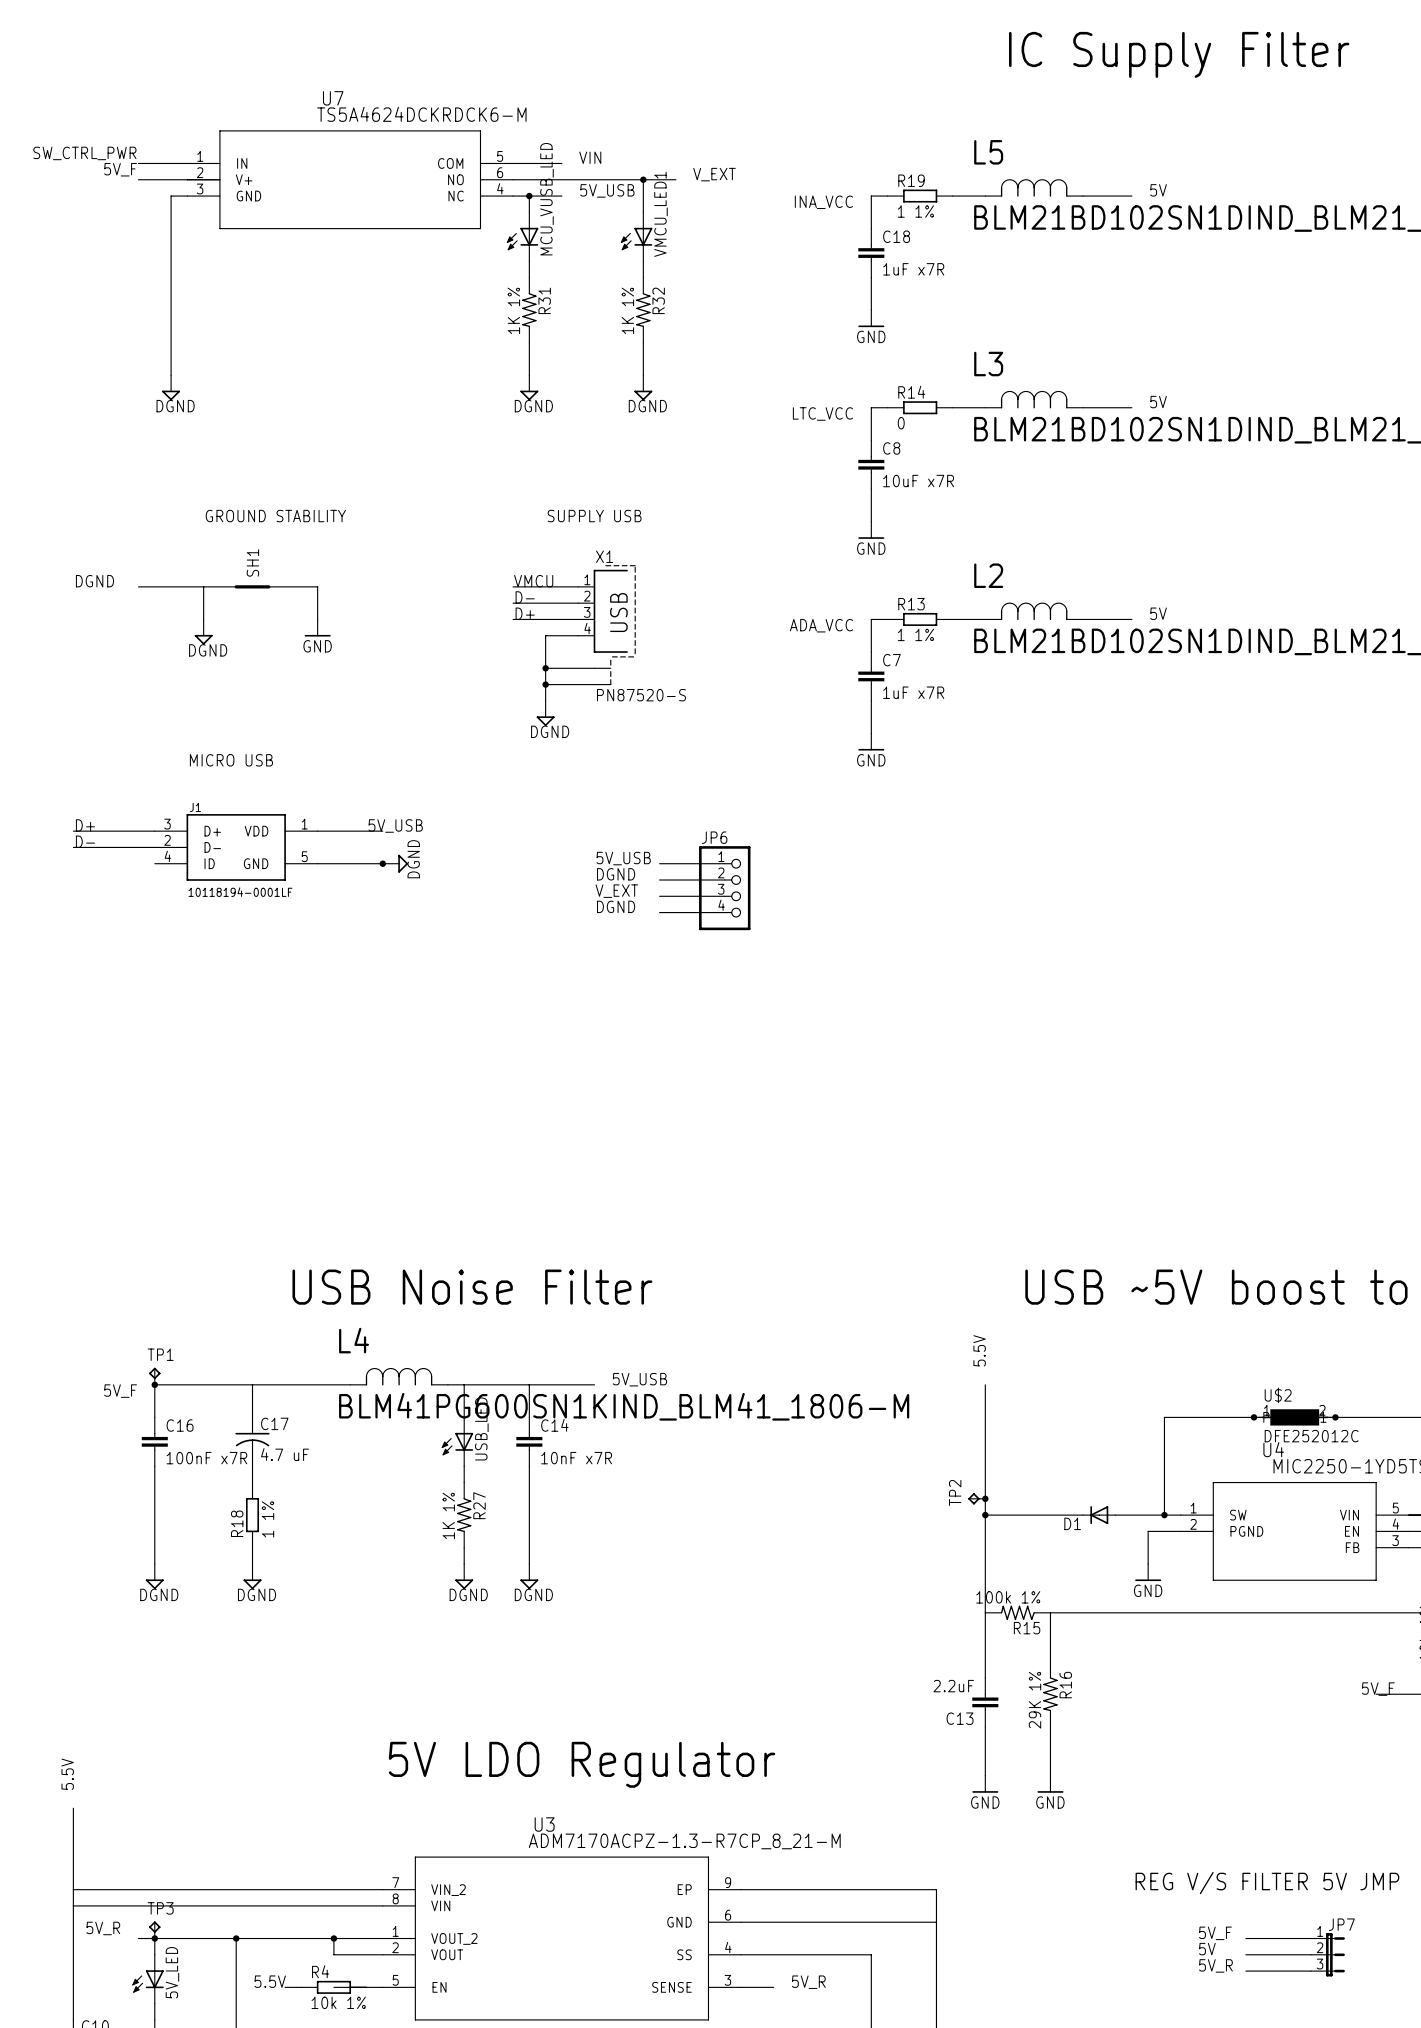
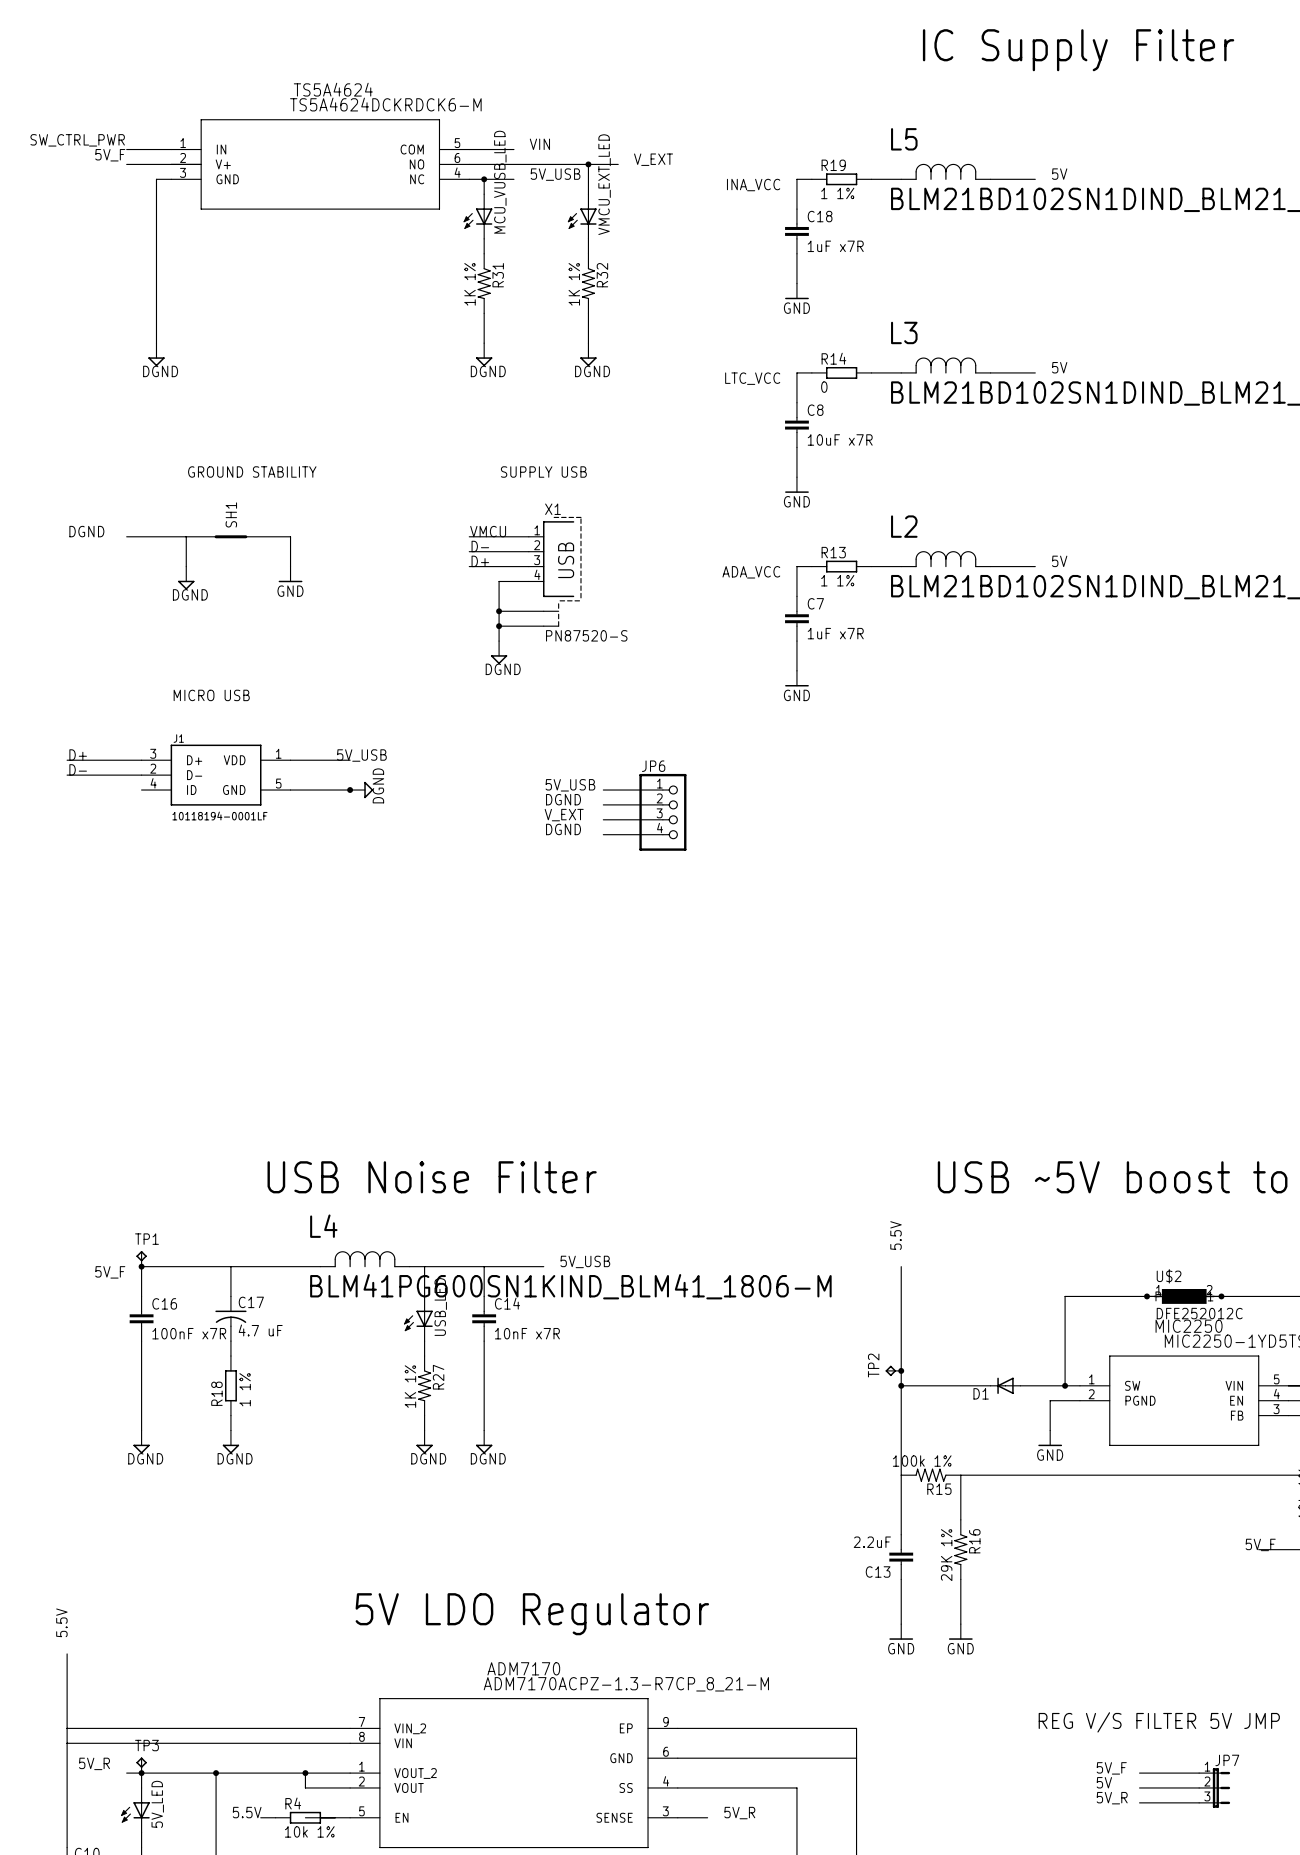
U7 name: U7 (333, 98) -> TS5A4624 (333, 89)
VMCU_LED1 name: VMCU_LED1 (660, 214) -> VMCU_EXT_LED (604, 184)
U4 name: U4 (1273, 1449) -> MIC2250 (1189, 1326)
U3 name: U3 (544, 1824) -> ADM7170 (523, 1668)

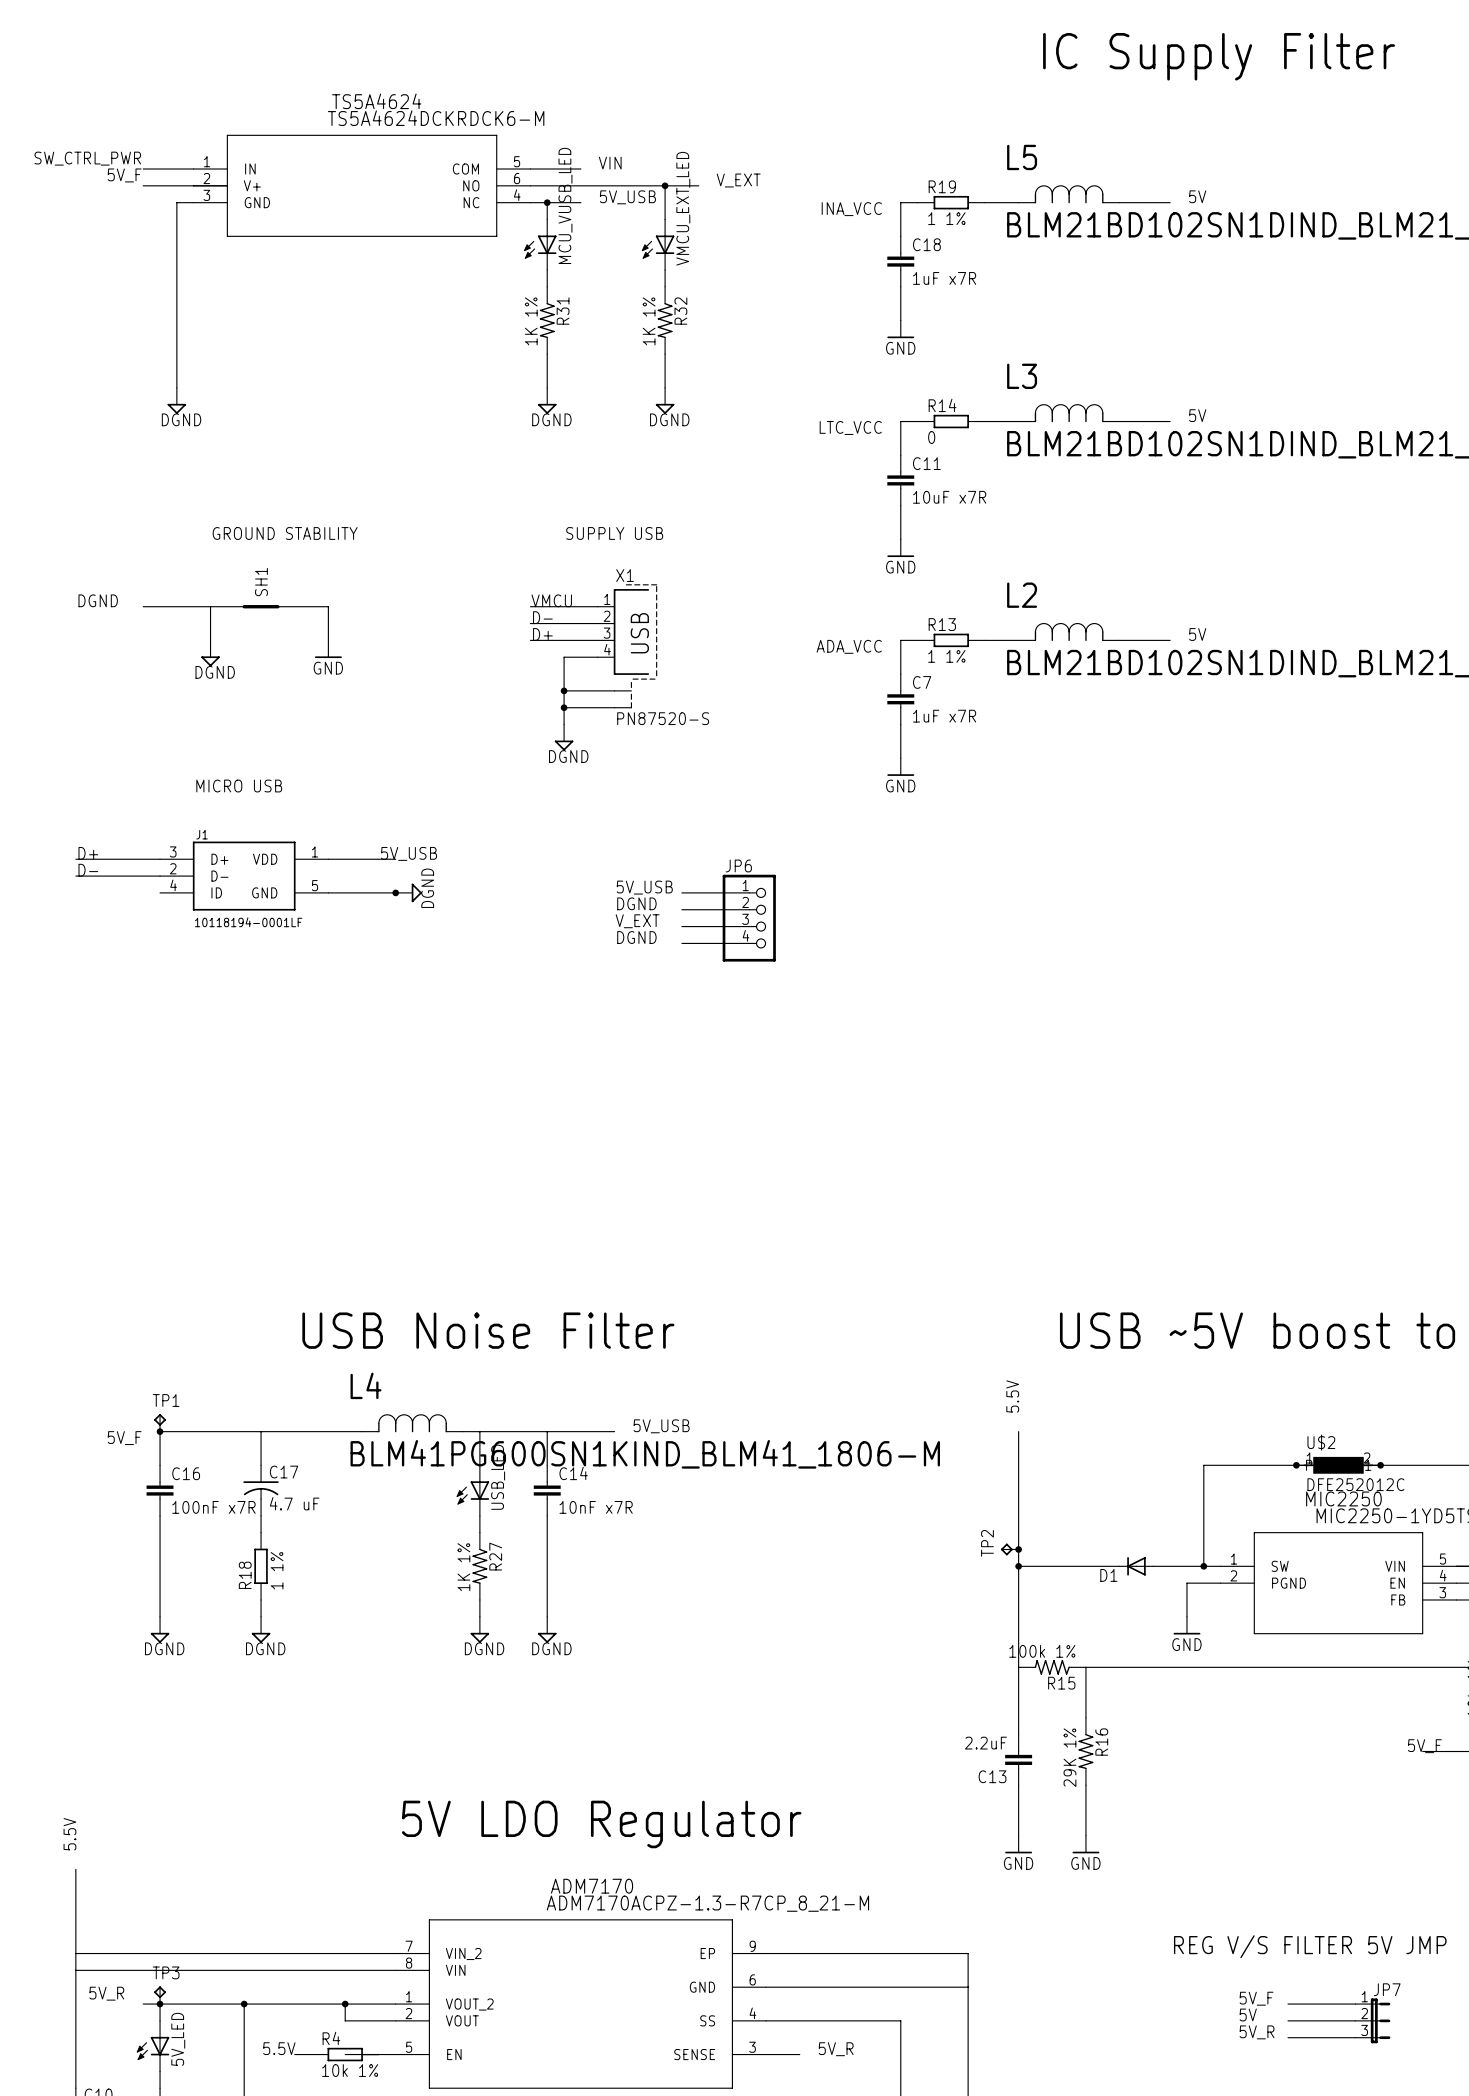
C8 name: C8 (815, 410) -> C11 (926, 463)

